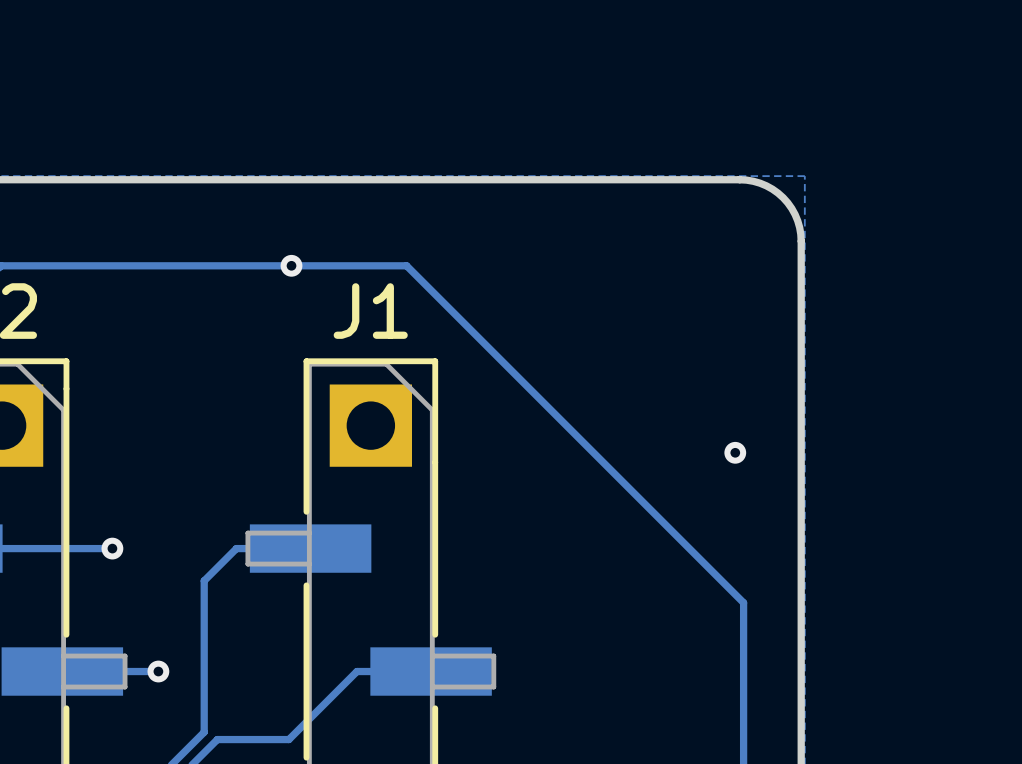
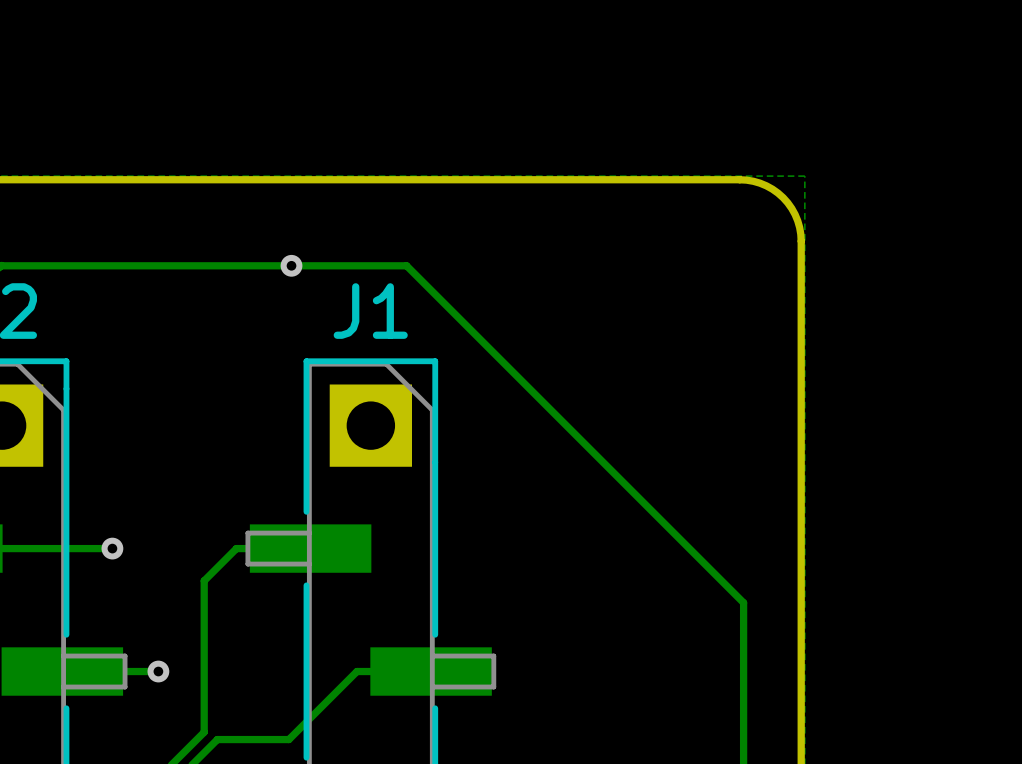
via: (735, 452) -> none

